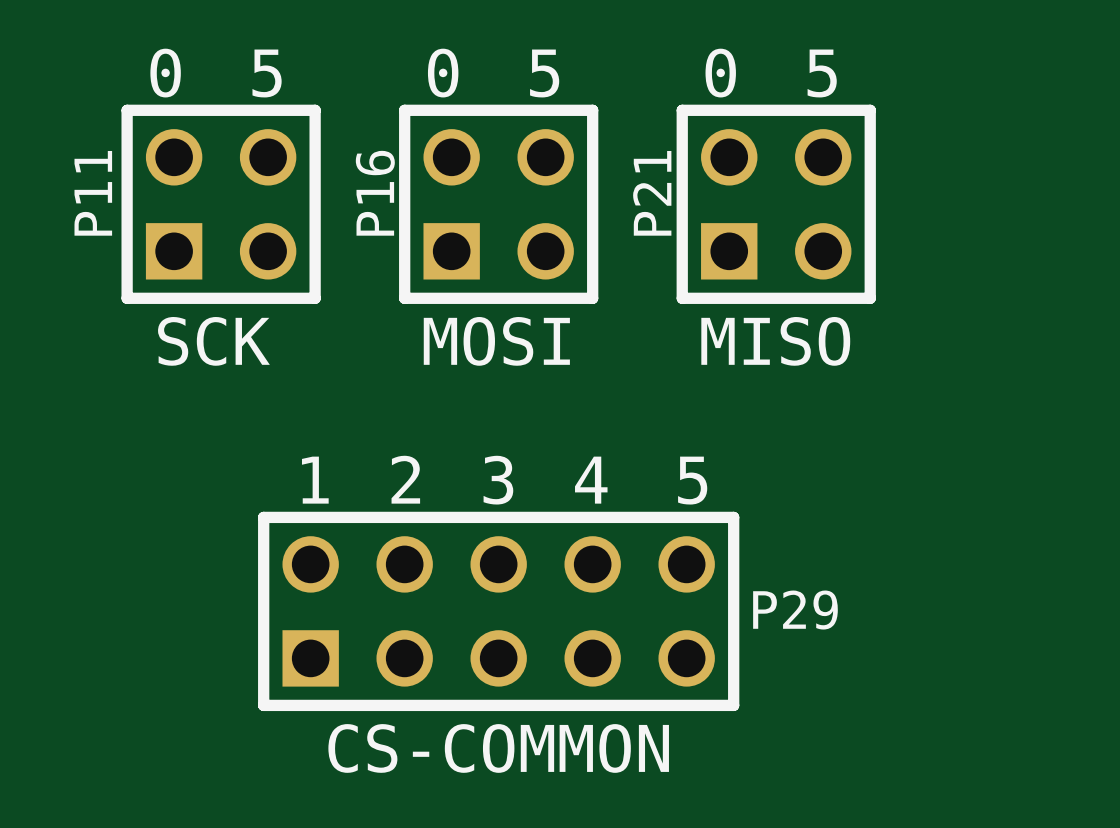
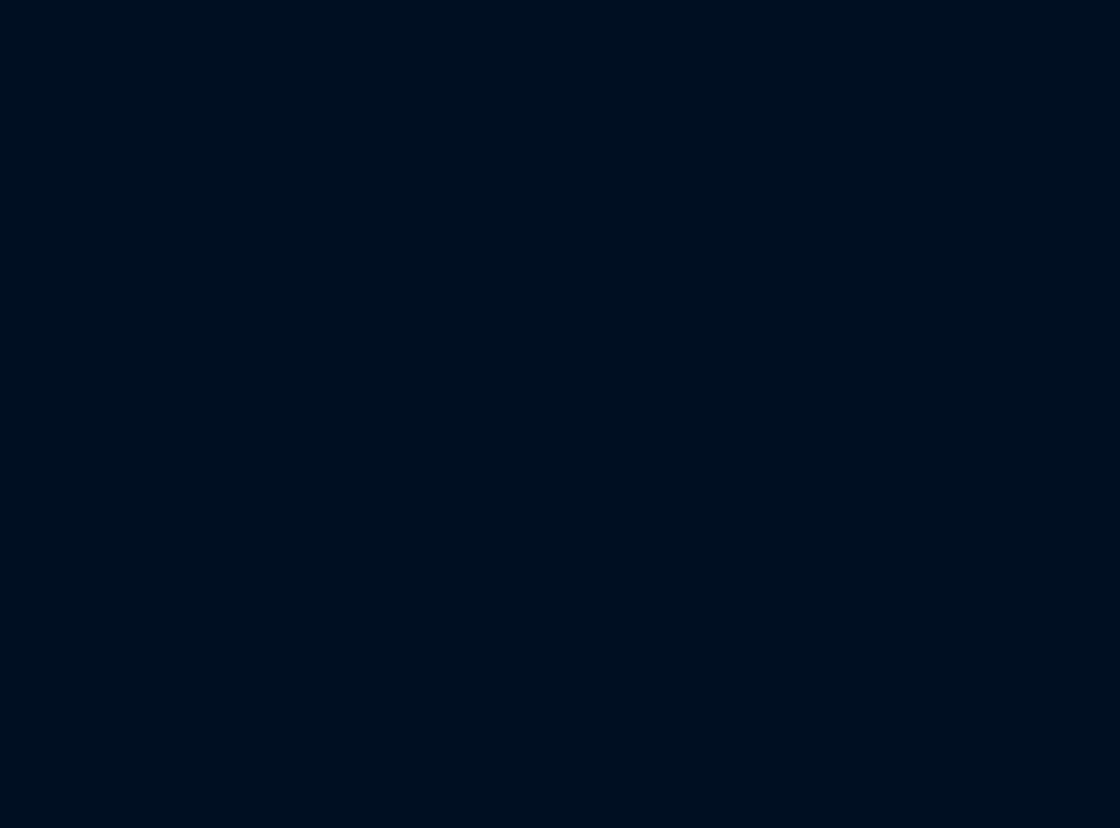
text: 0 (165, 73) -> none
text: 5 (267, 73) -> none
text: 0 (443, 73) -> none
text: 5 (544, 73) -> none
text: 0 (720, 73) -> none
text: 5 (822, 73) -> none
P11: (221, 204) -> none
P16: (498, 204) -> none
P21: (776, 204) -> none
text: SCK (213, 341) -> none
text: MOSI (496, 341) -> none
text: MISO (775, 341) -> none
text: 2 (405, 479) -> none
text: 1 (315, 480) -> none
text: 3 (498, 480) -> none
text: 4 (591, 480) -> none
text: 5 (692, 480) -> none
P29: (498, 611) -> none
text: CS-COMMON (498, 748) -> none

